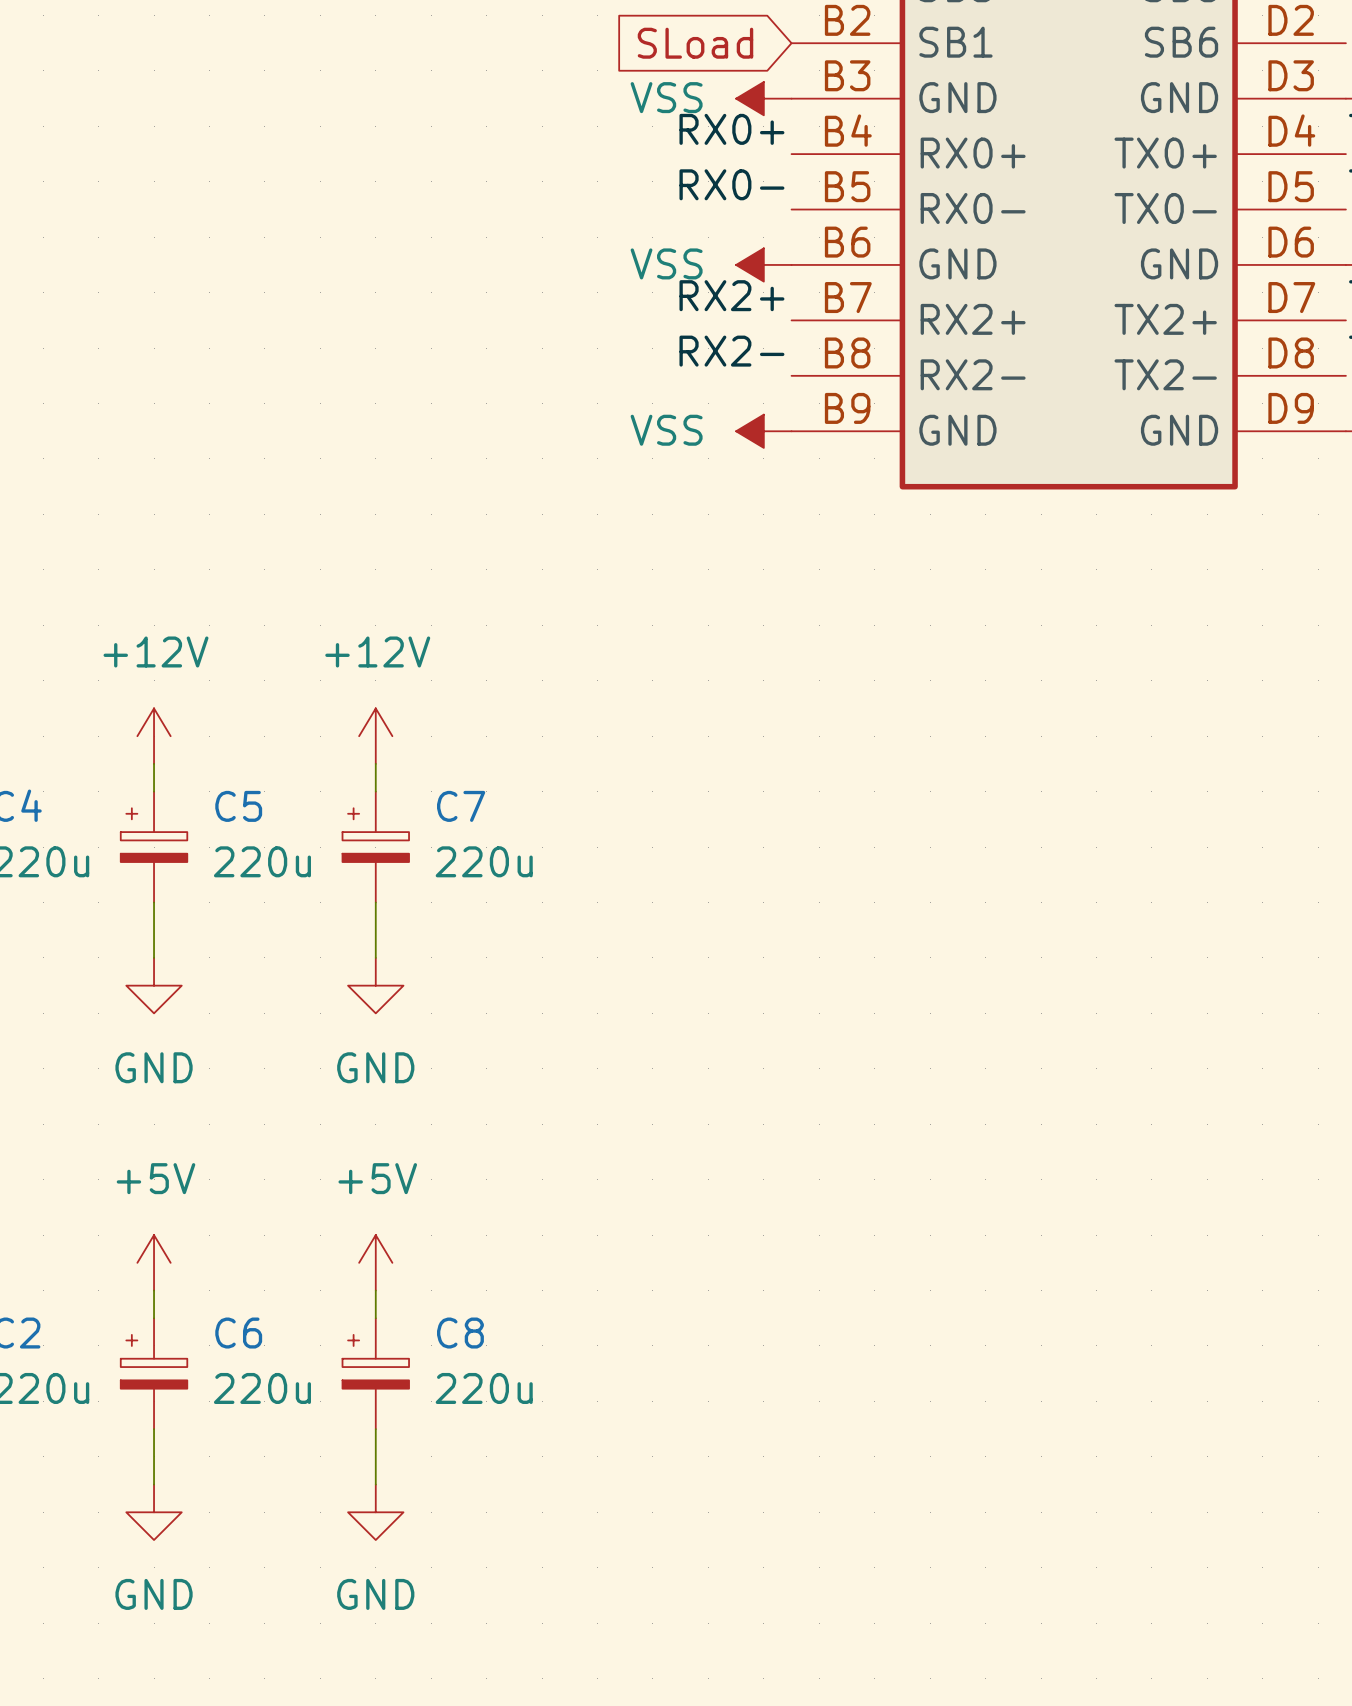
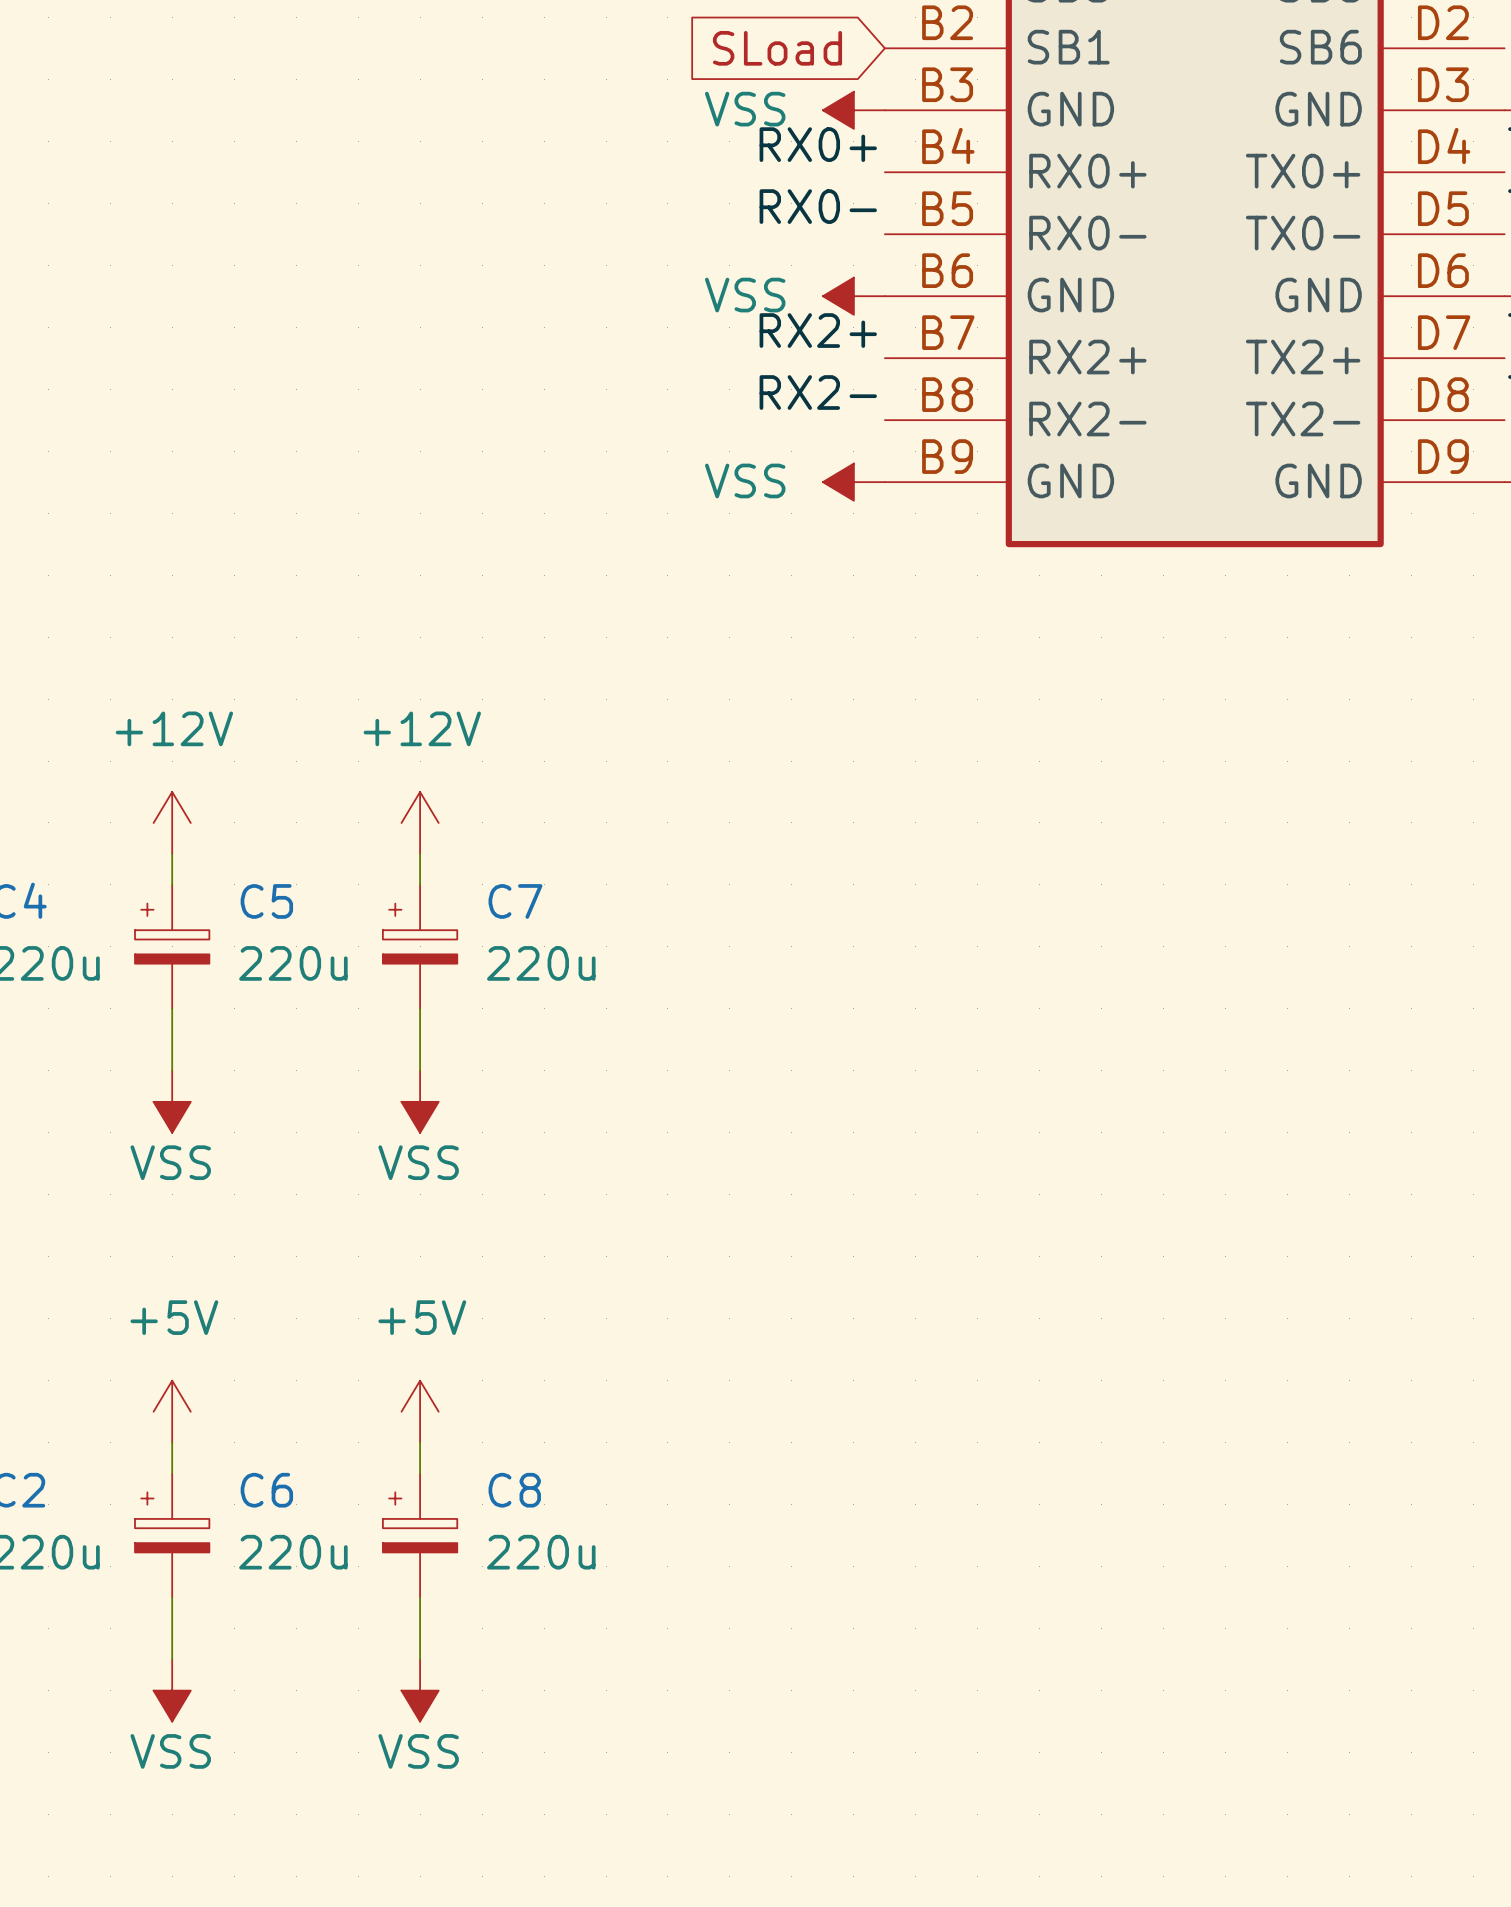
power symbol: GND (154, 985) -> VSS (172, 1101)
power symbol: GND (375, 985) -> VSS (420, 1101)
power symbol: GND (154, 1512) -> VSS (172, 1690)
power symbol: GND (375, 1512) -> VSS (420, 1690)

